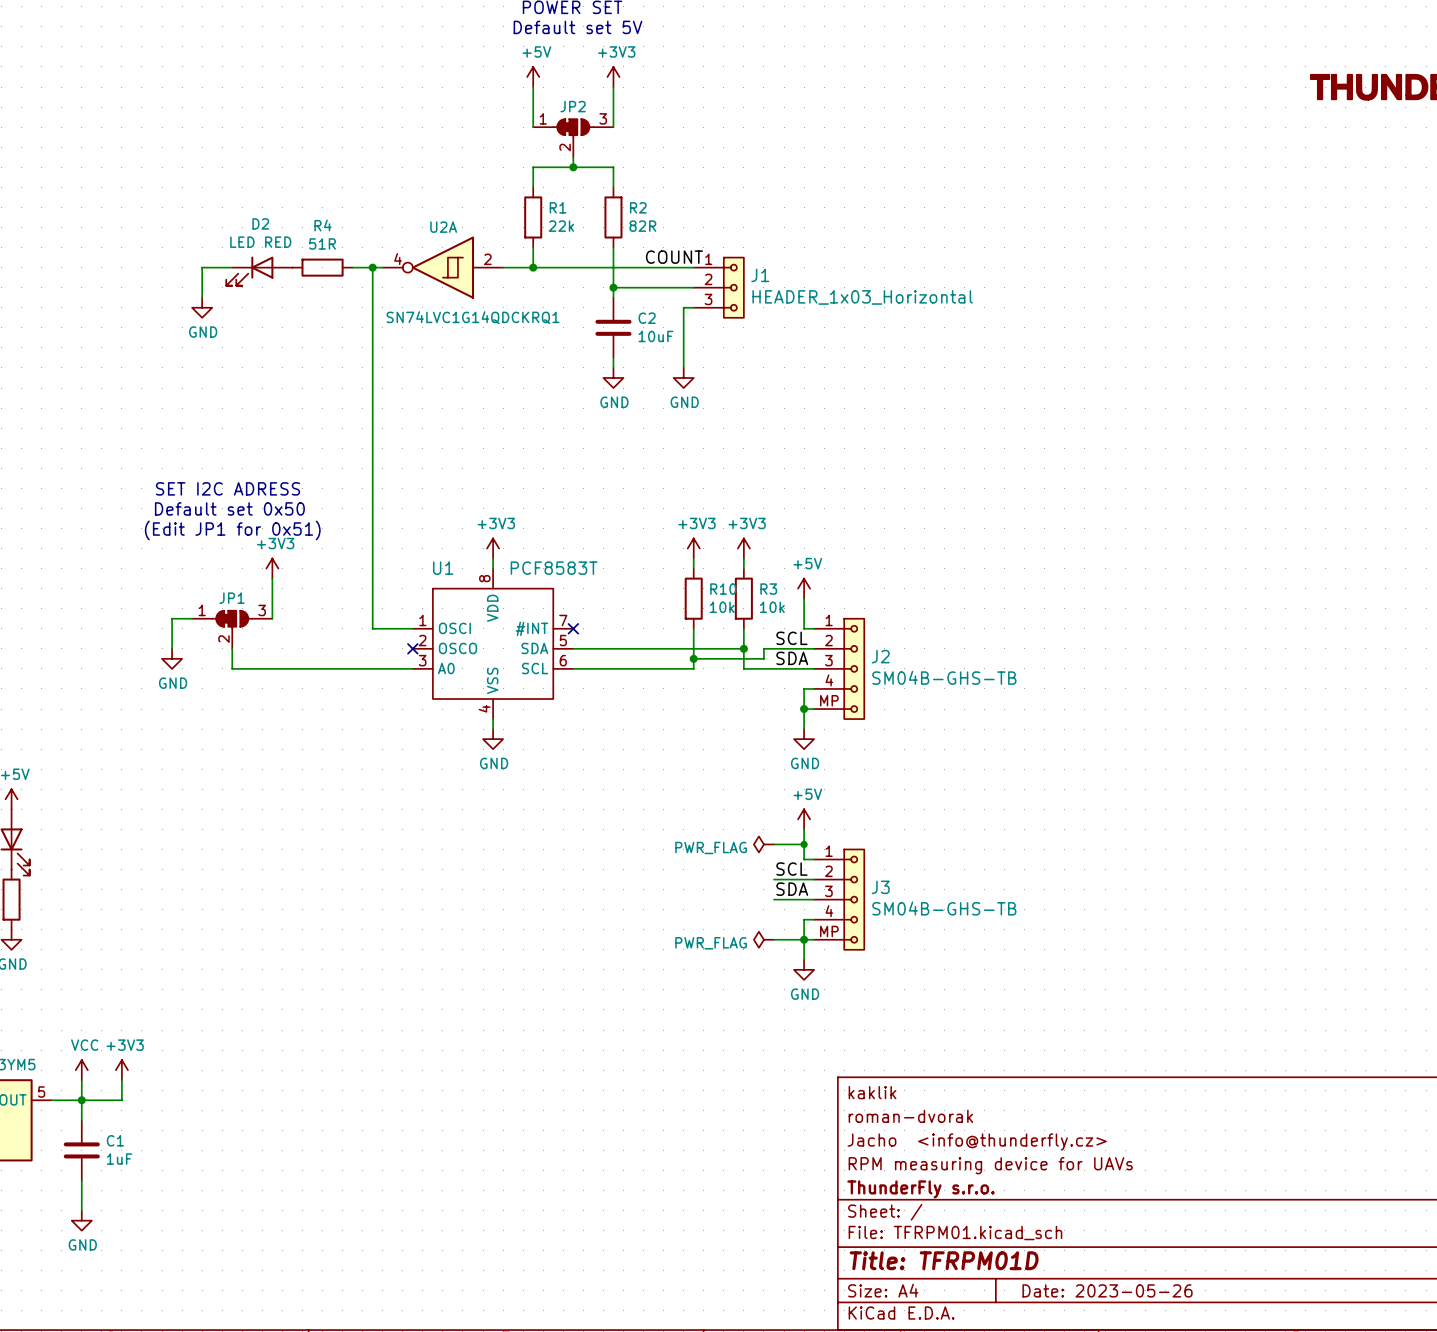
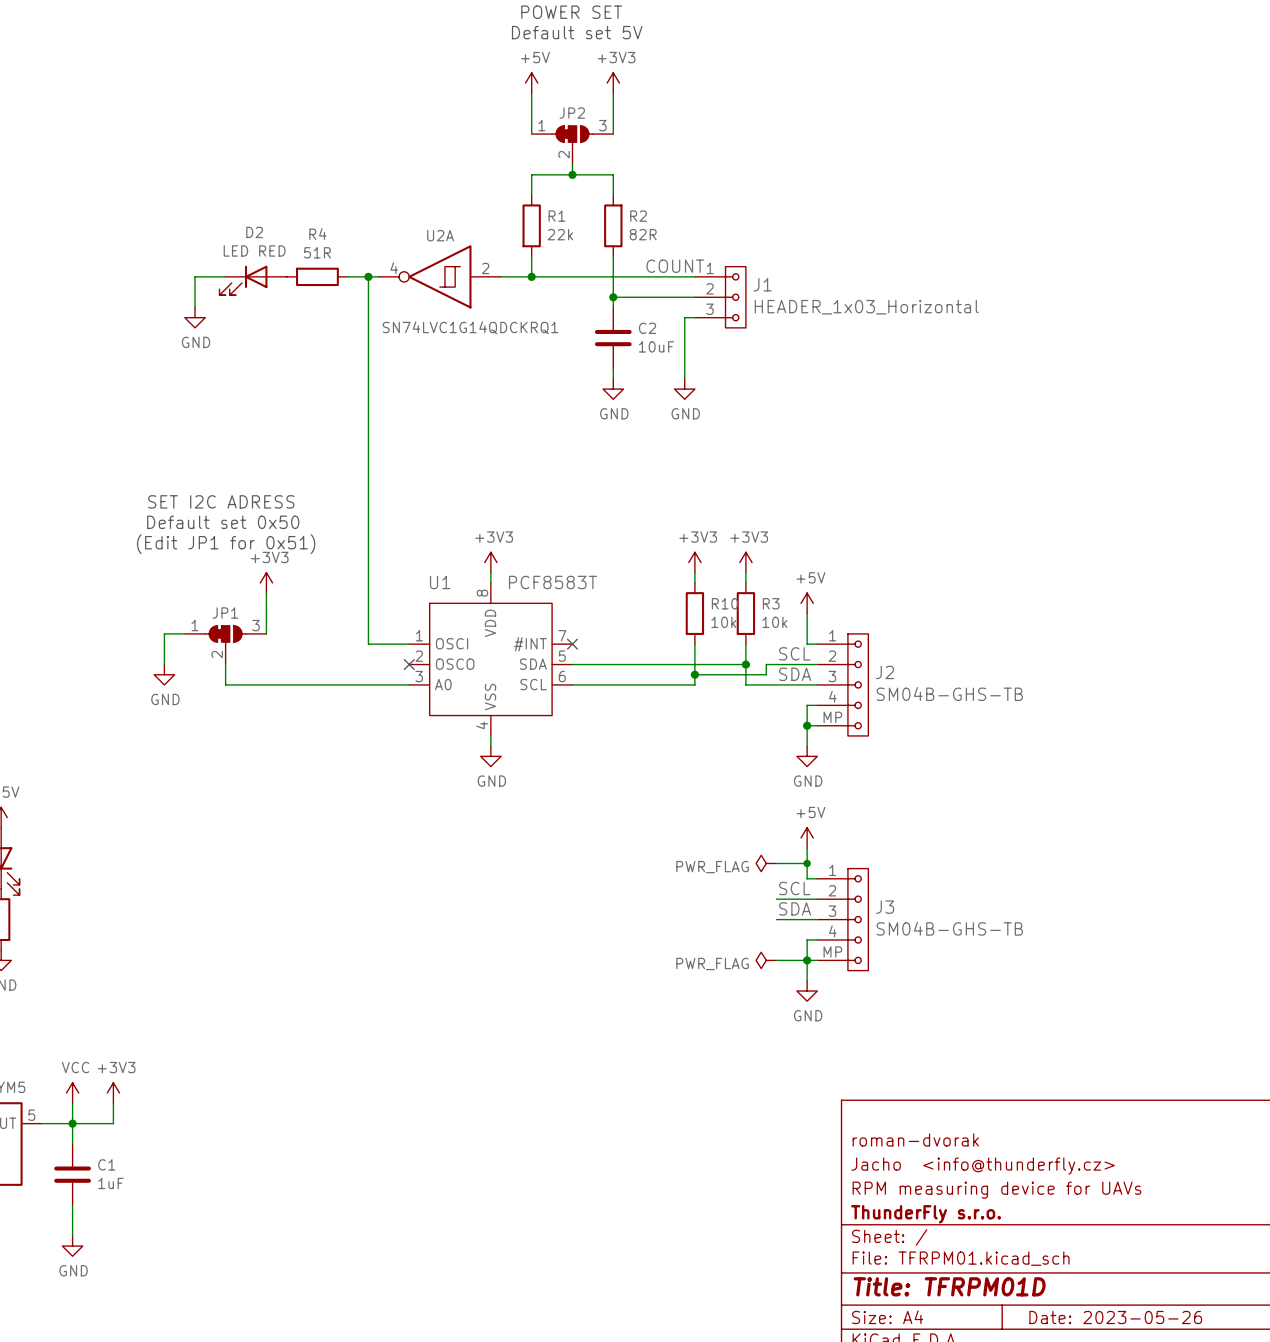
title block: kaklik (872, 1092) -> none

